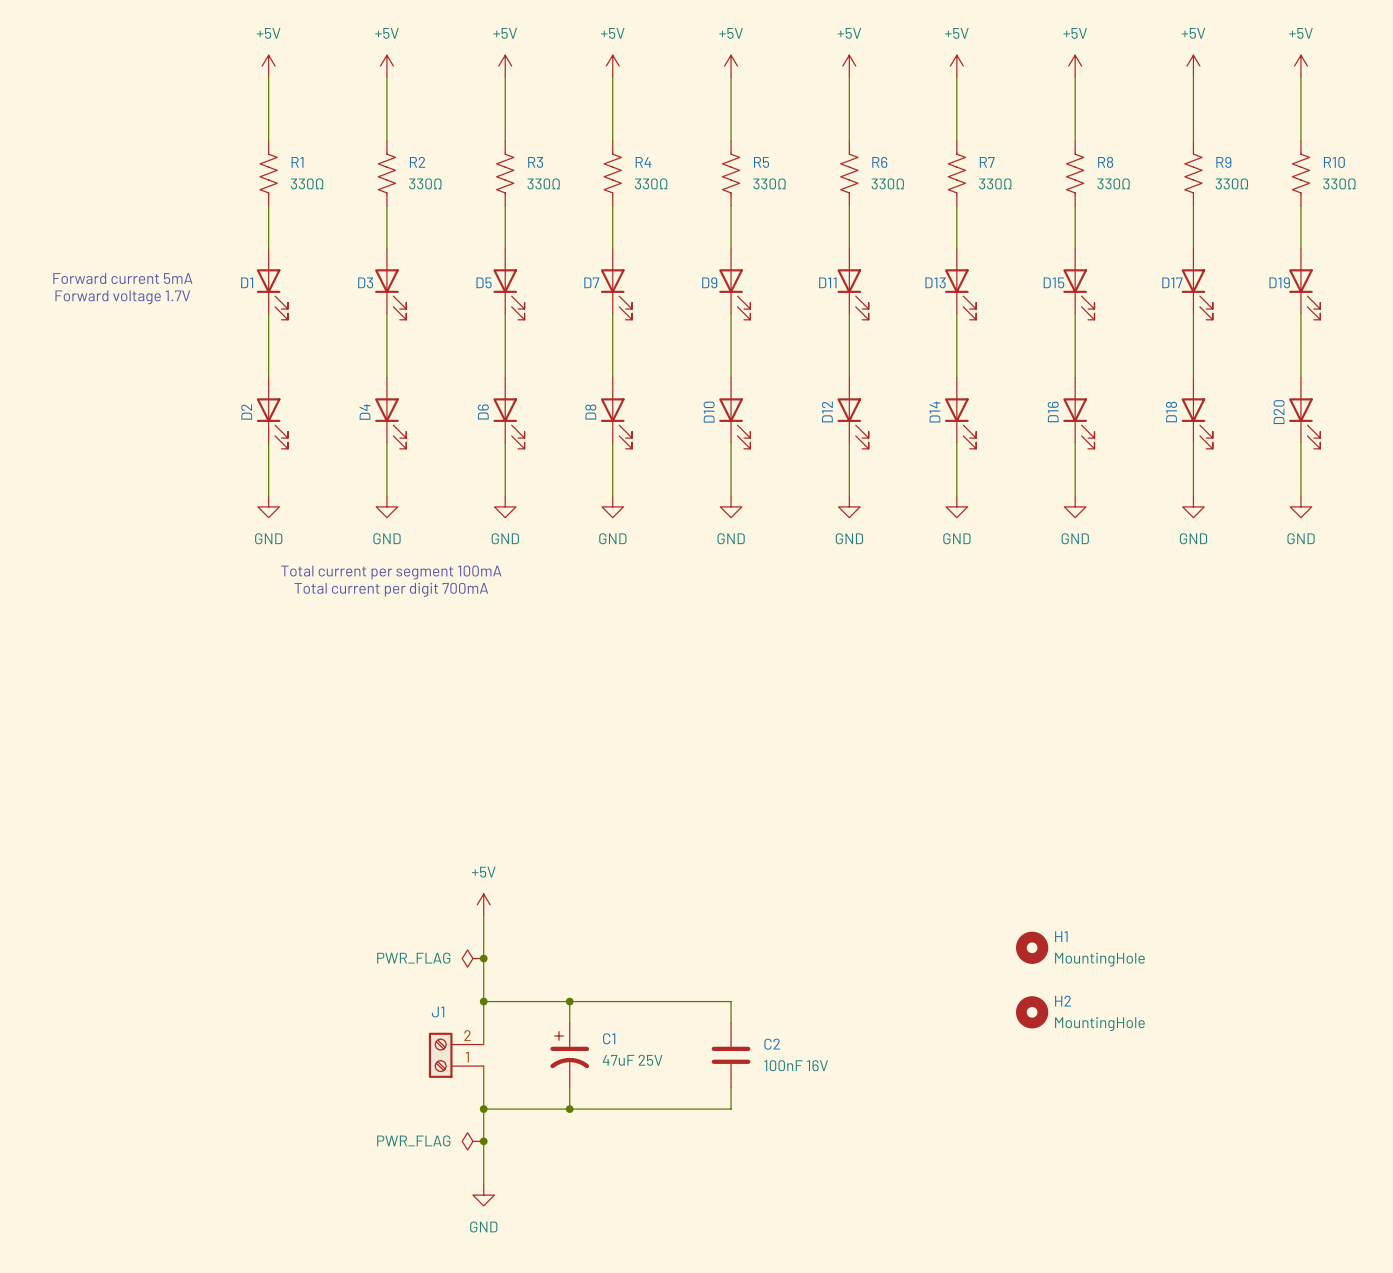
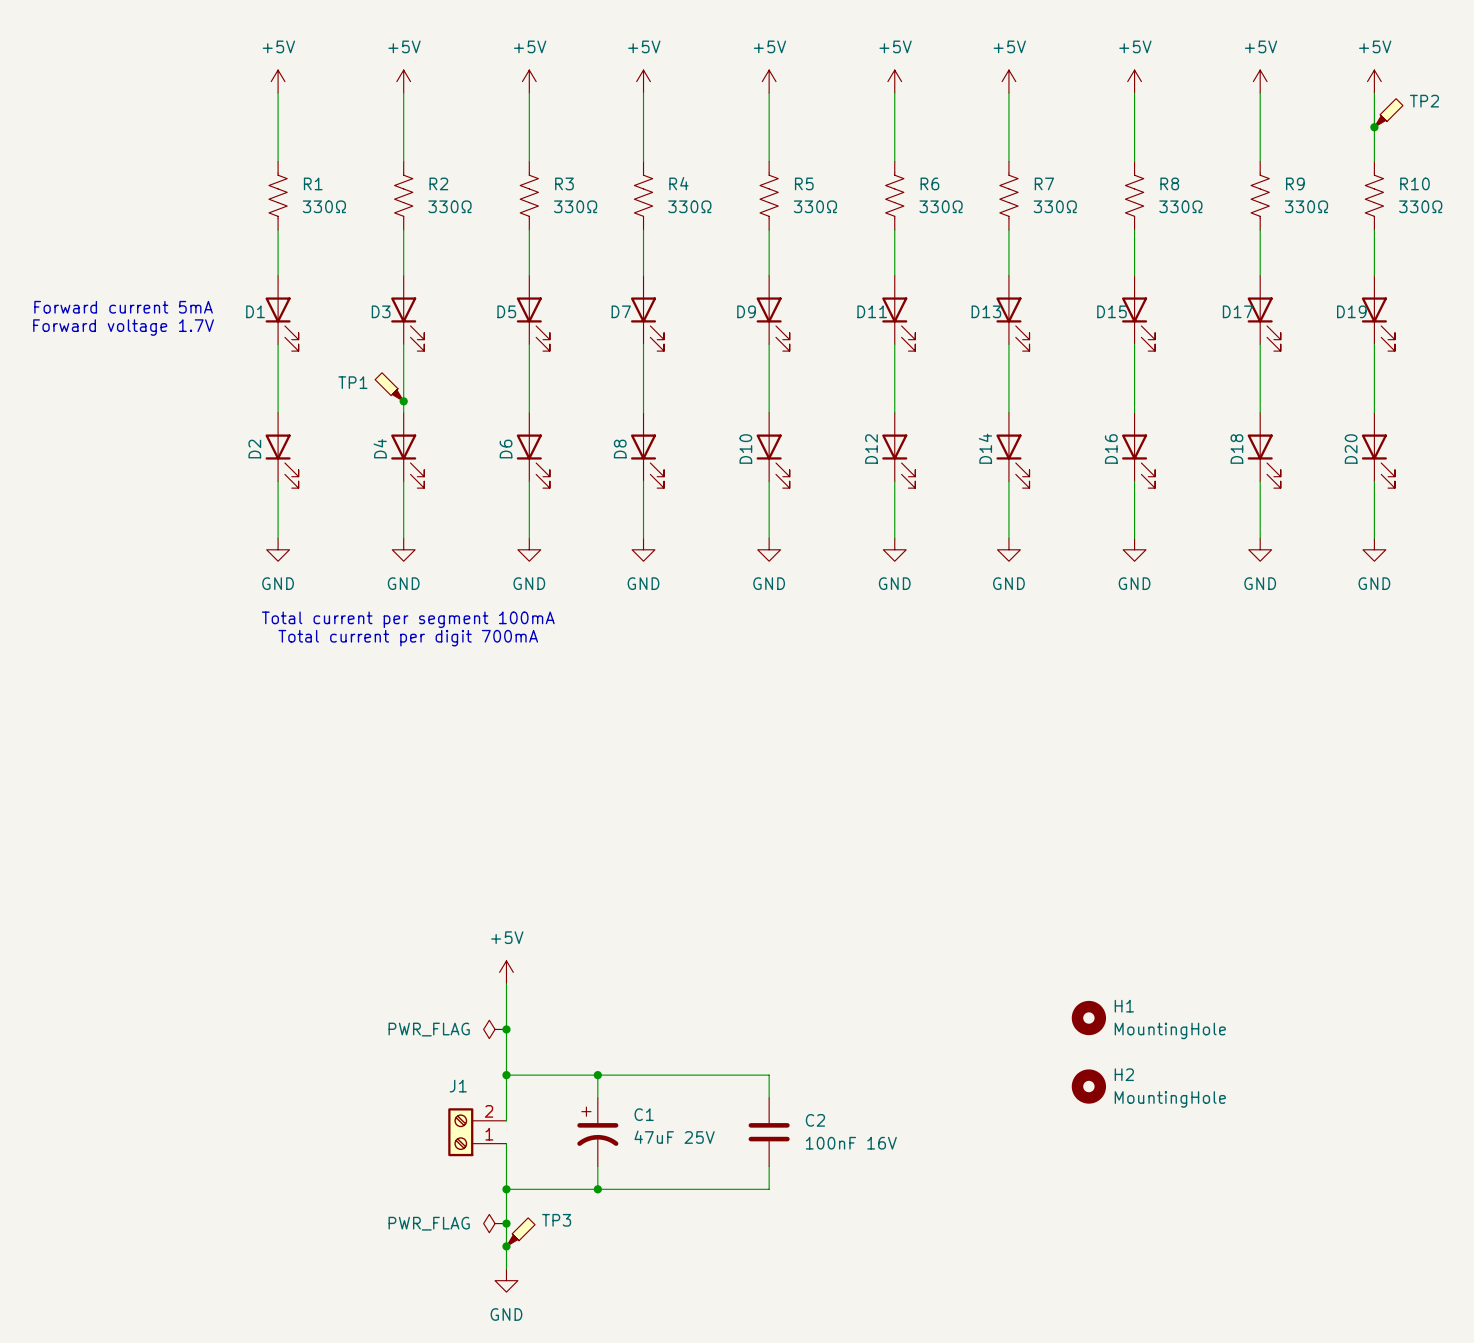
TP2: none -> (1388, 112)
junction: none -> (1374, 127)
TP1: none -> (389, 387)
junction: none -> (403, 401)
TP3: none -> (520, 1232)
junction: none -> (506, 1246)

